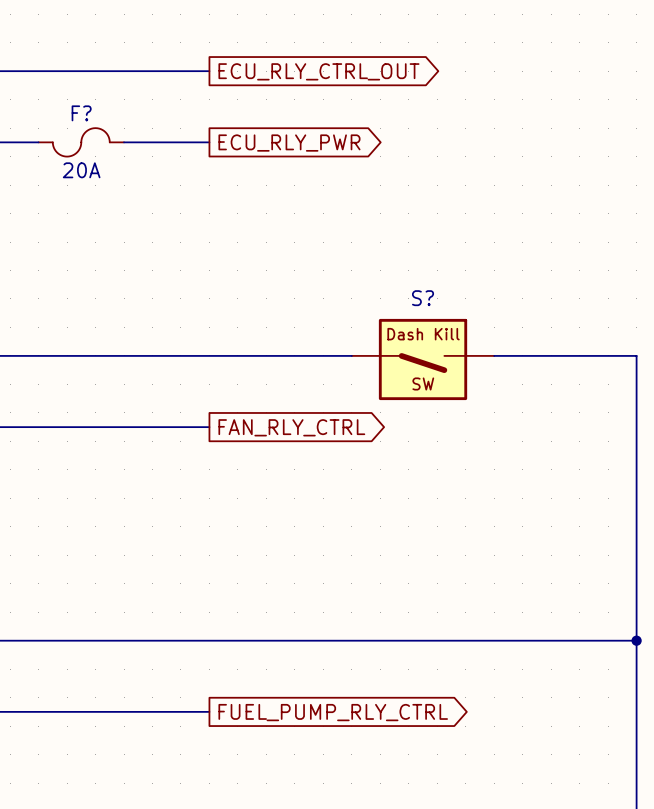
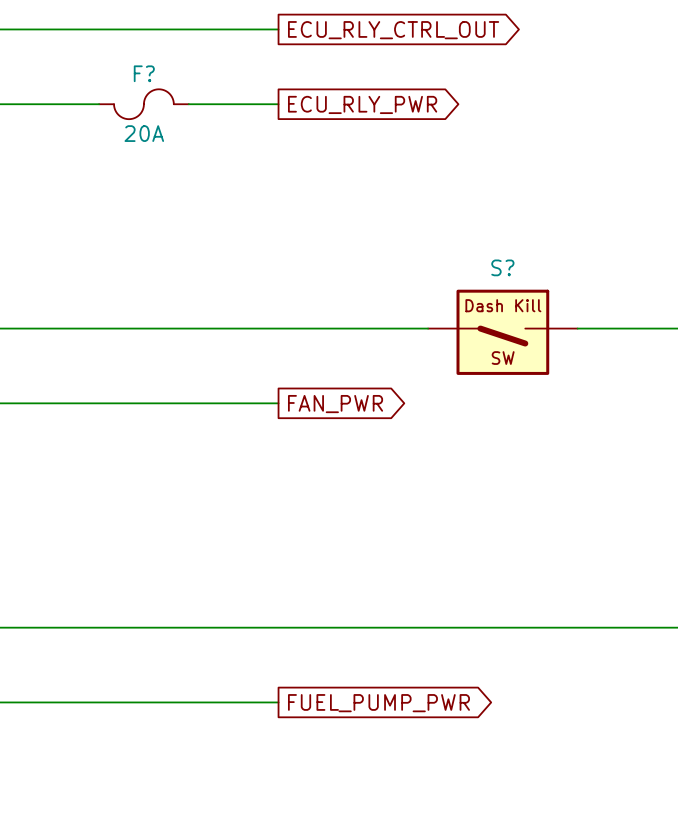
global label: FAN_RLY_CTRL (291, 427) -> FAN_PWR (335, 404)
global label: FUEL_PUMP_RLY_CTRL (333, 712) -> FUEL_PUMP_PWR (378, 703)

